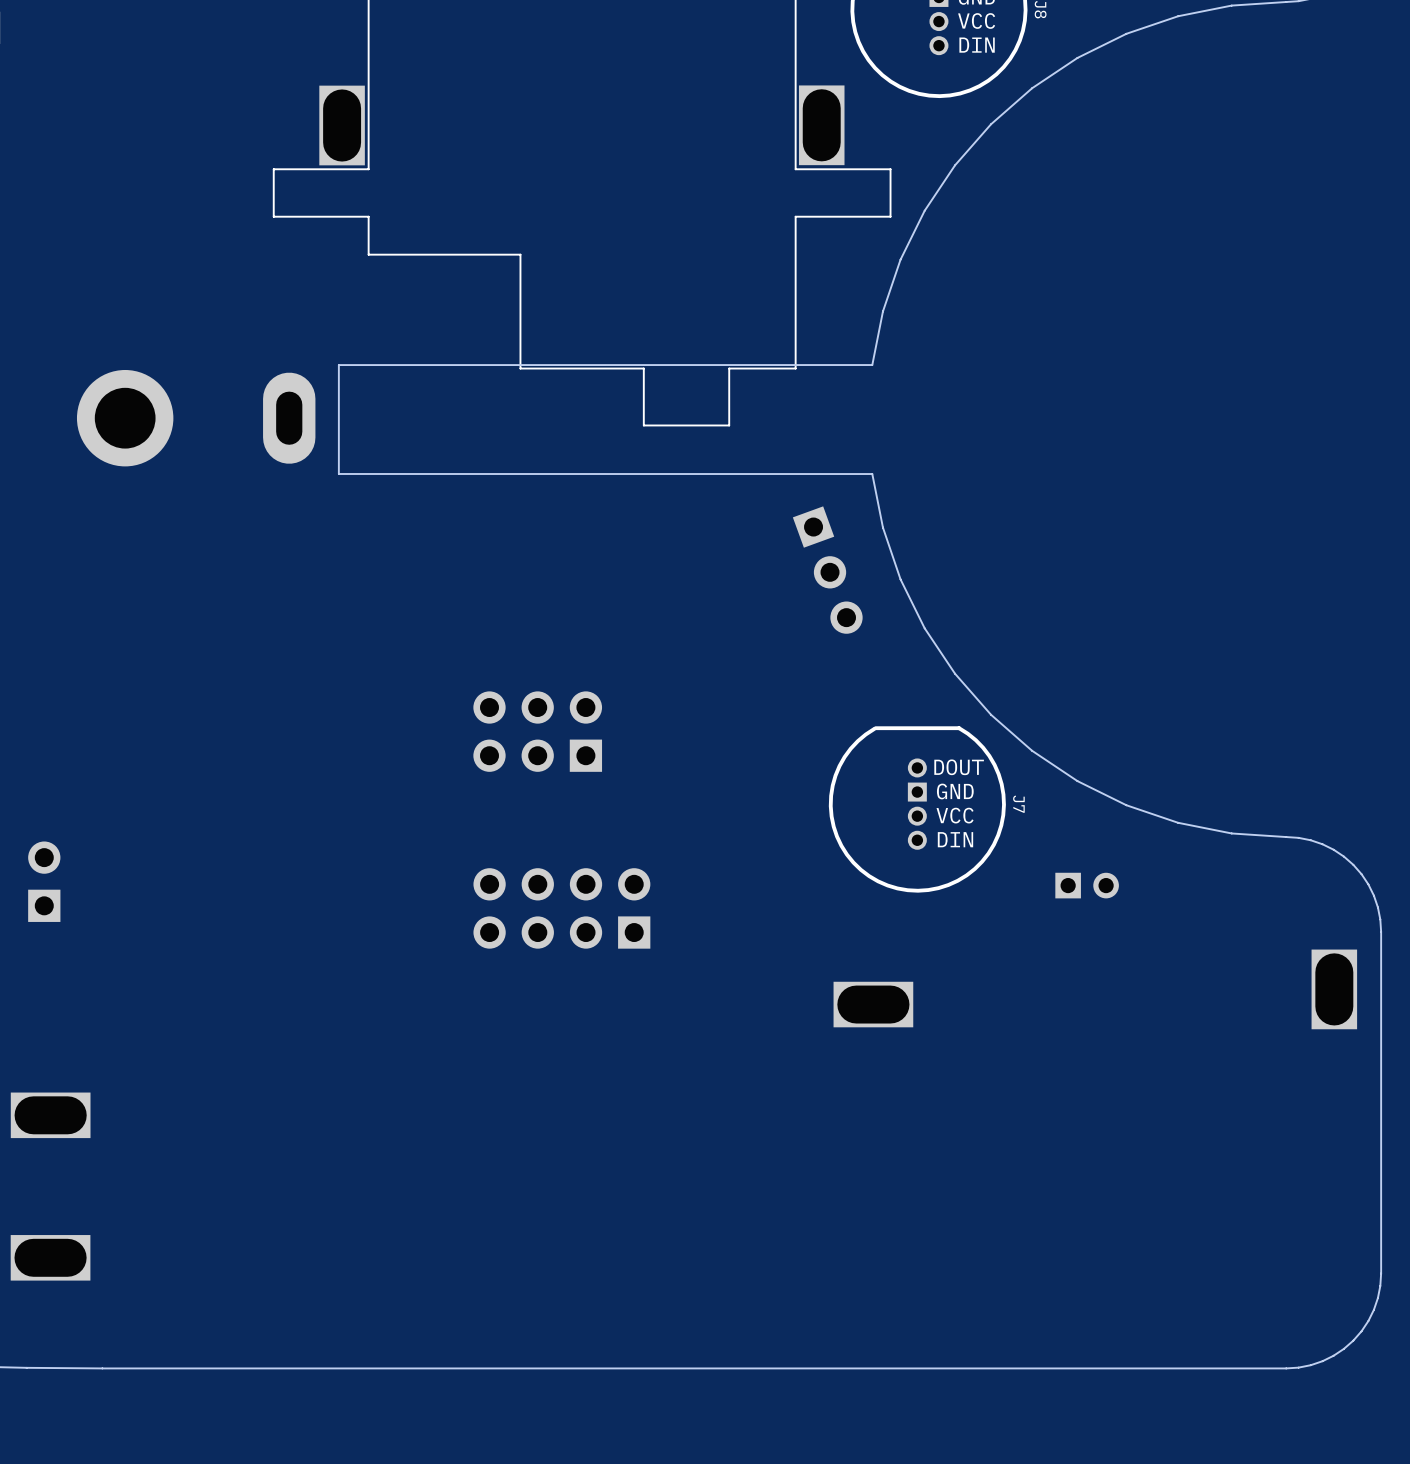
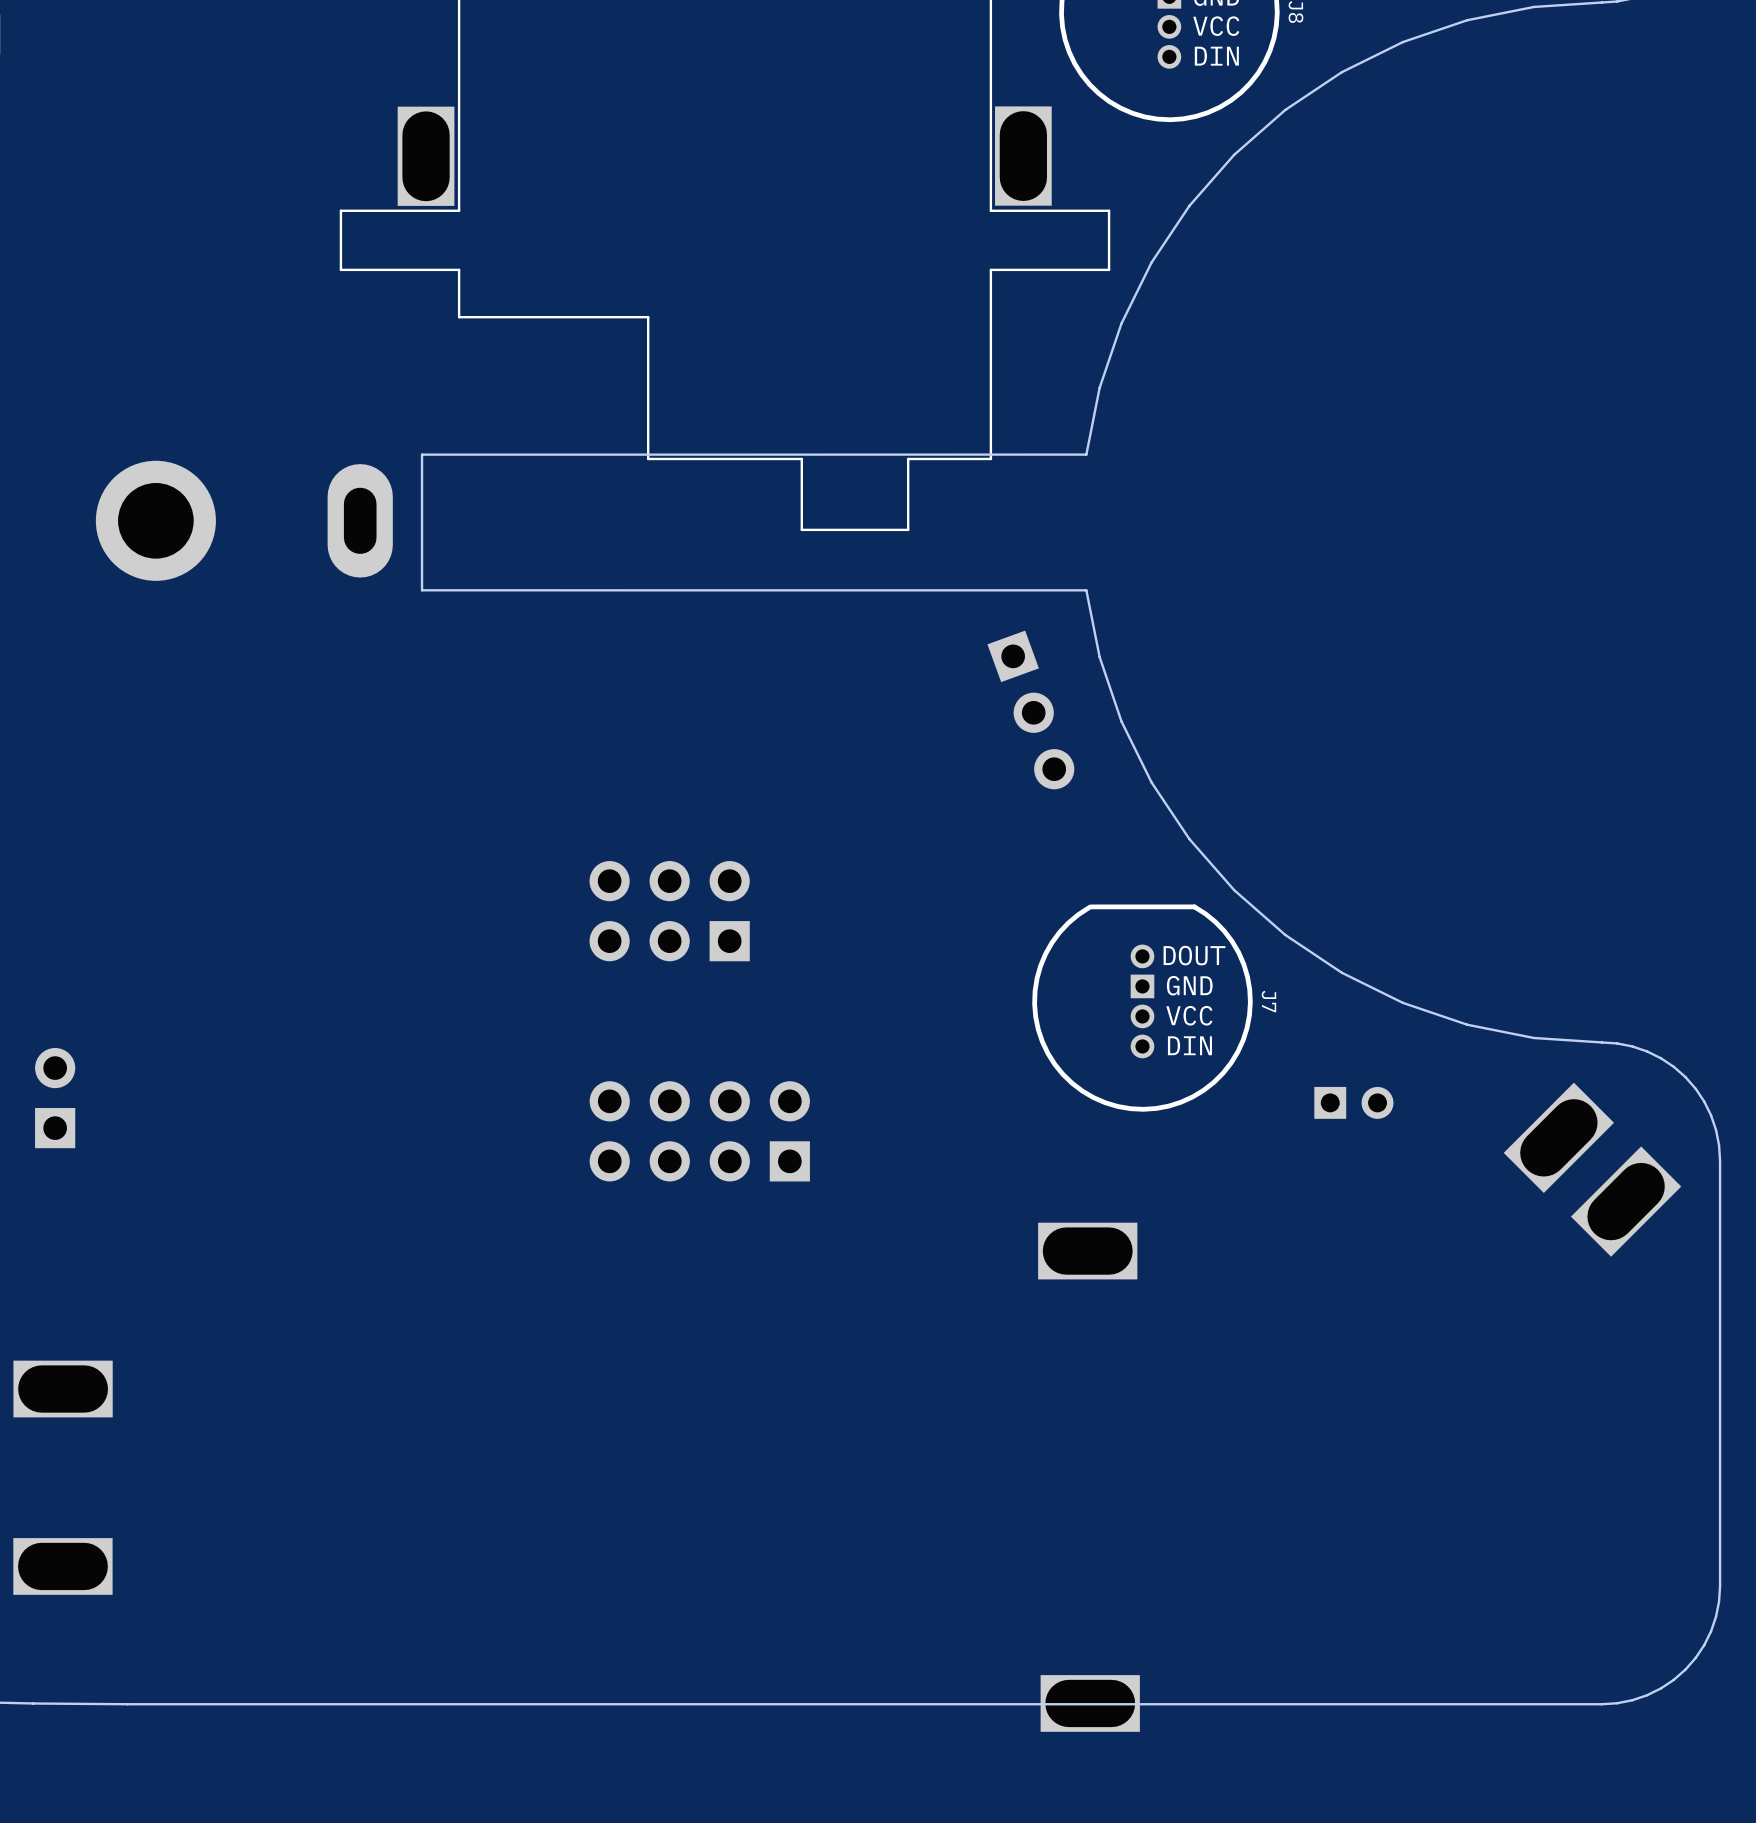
part: none -> (1558, 1137)
part: none -> (1626, 1201)
part: (1334, 989) -> none
part: none -> (1090, 1703)

